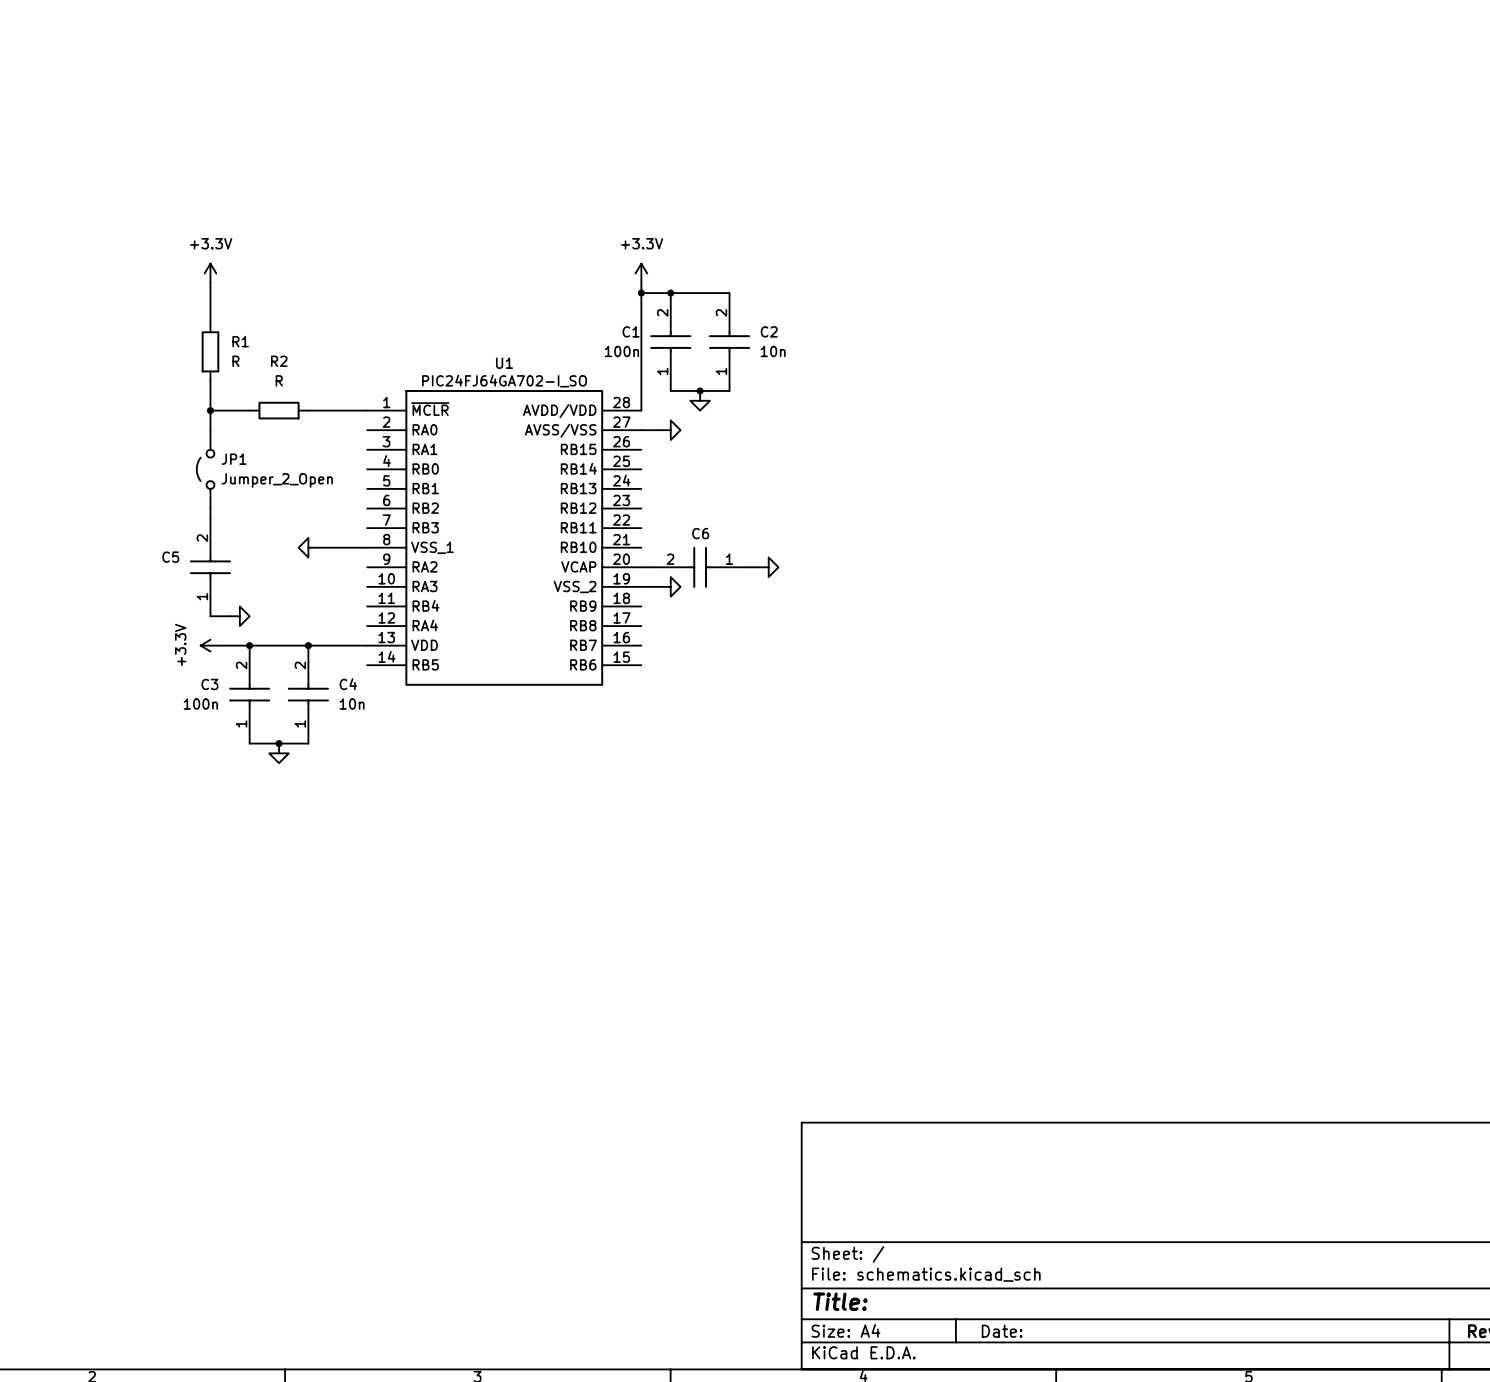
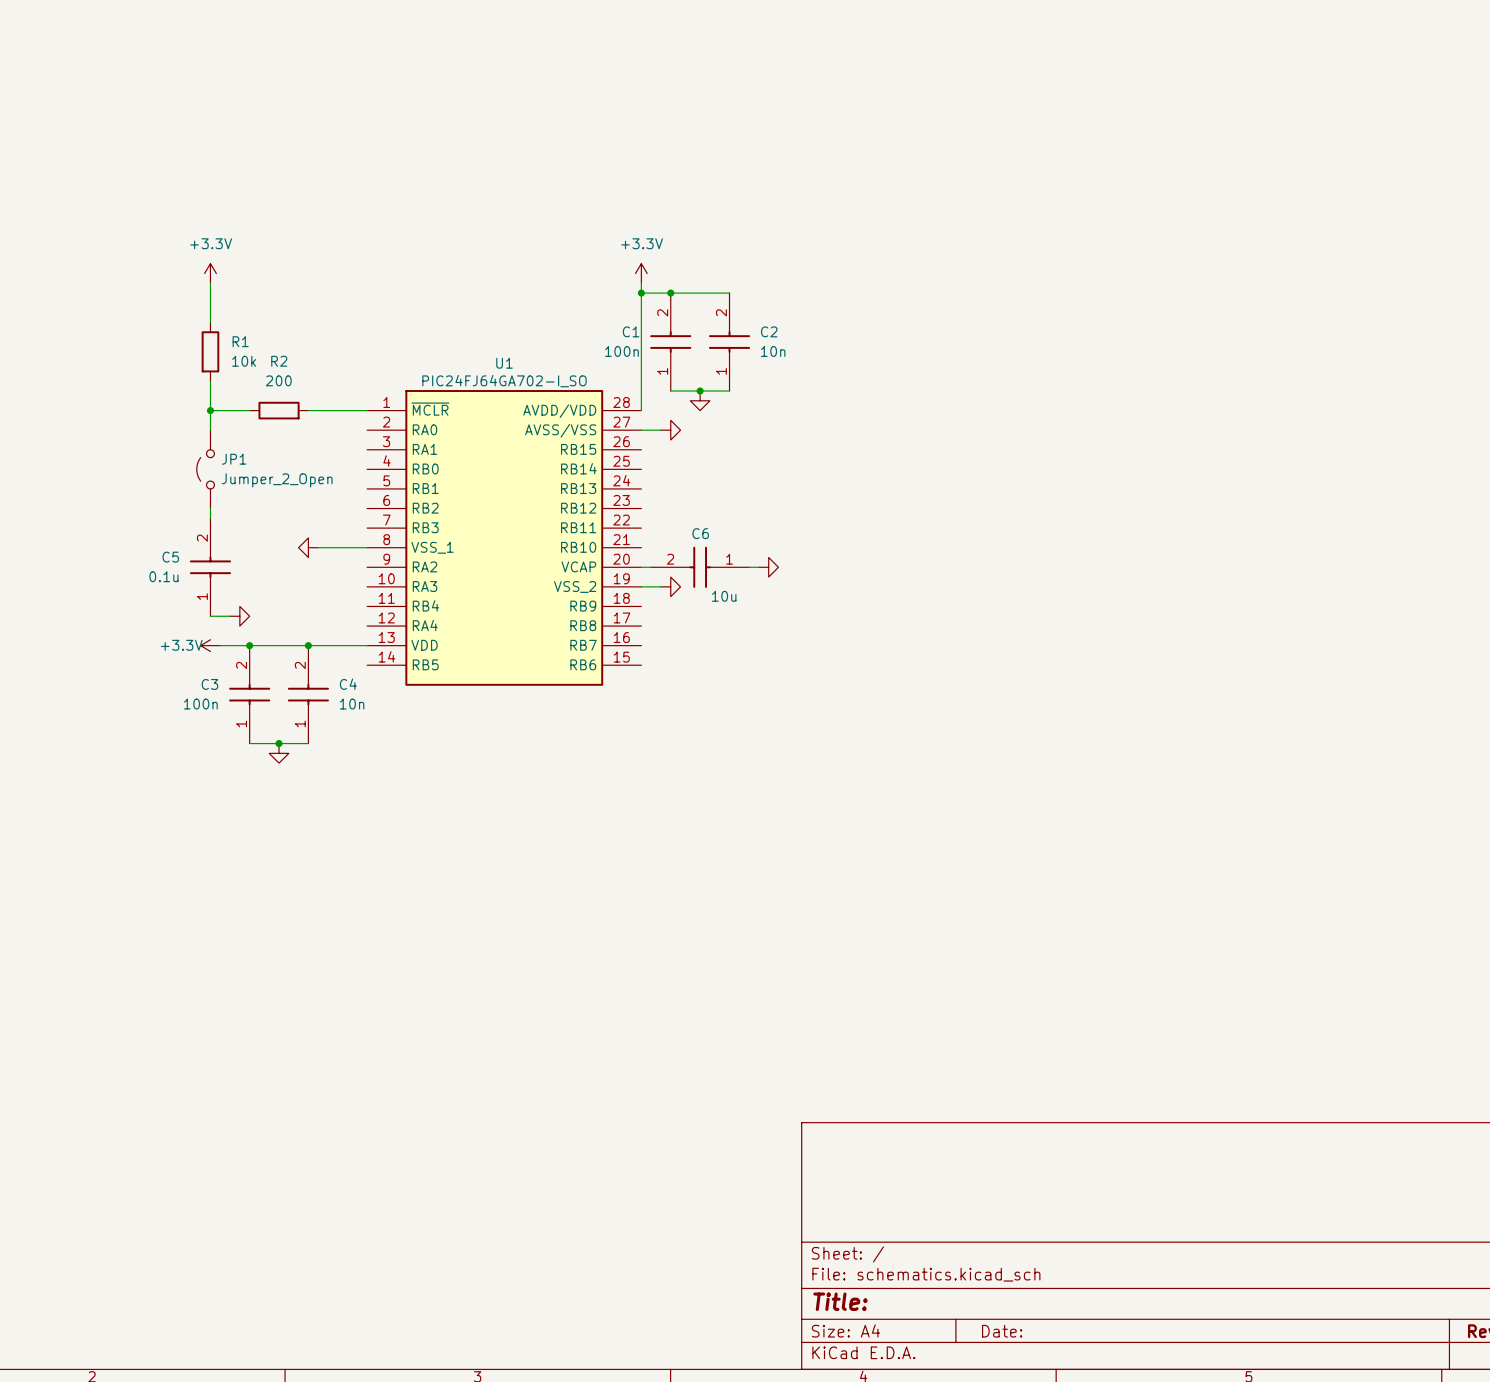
R1 value: R (235, 361) -> 10k (244, 361)
R2 value: R (279, 380) -> 200 (278, 380)
C5 value: none -> 0.1u (164, 576)
C6 value: none -> 10u (724, 596)
power symbol text rotation: 0° (180, 644) -> 90° clockwise (181, 645)

